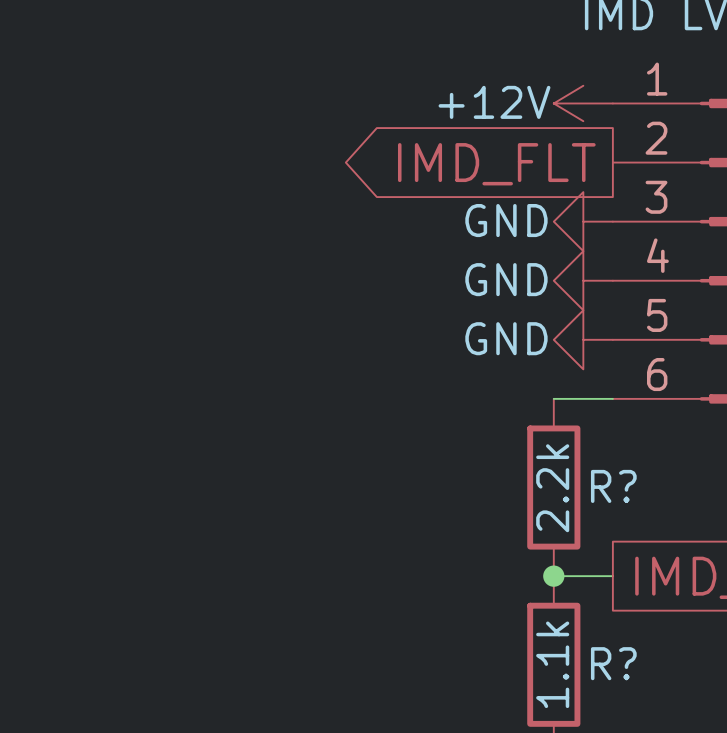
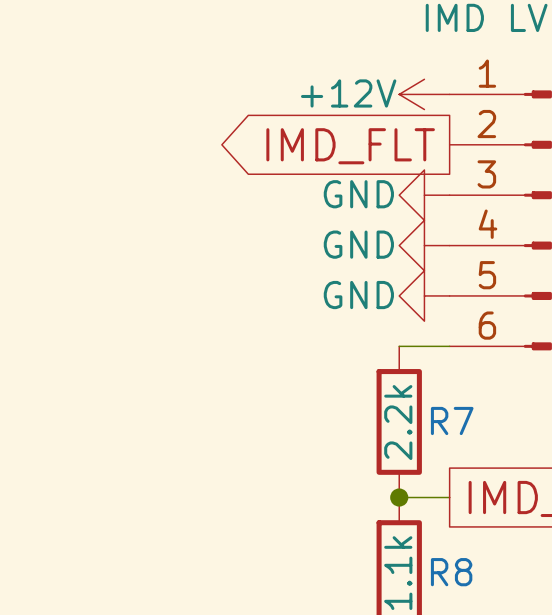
R? name: R? (613, 486) -> R7 (452, 420)
R? name: R? (613, 663) -> R8 (451, 572)

